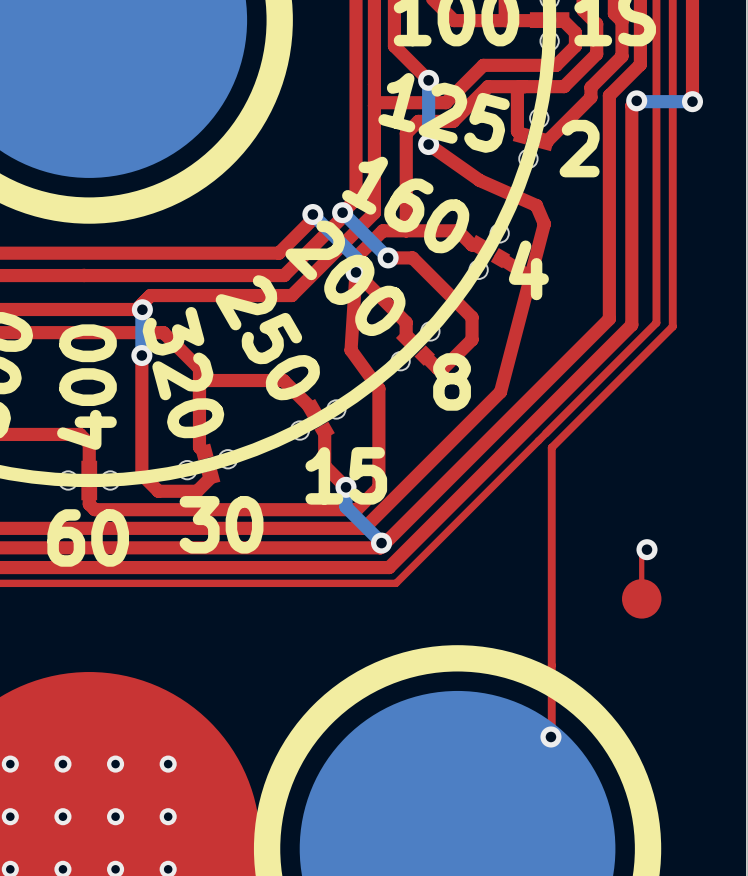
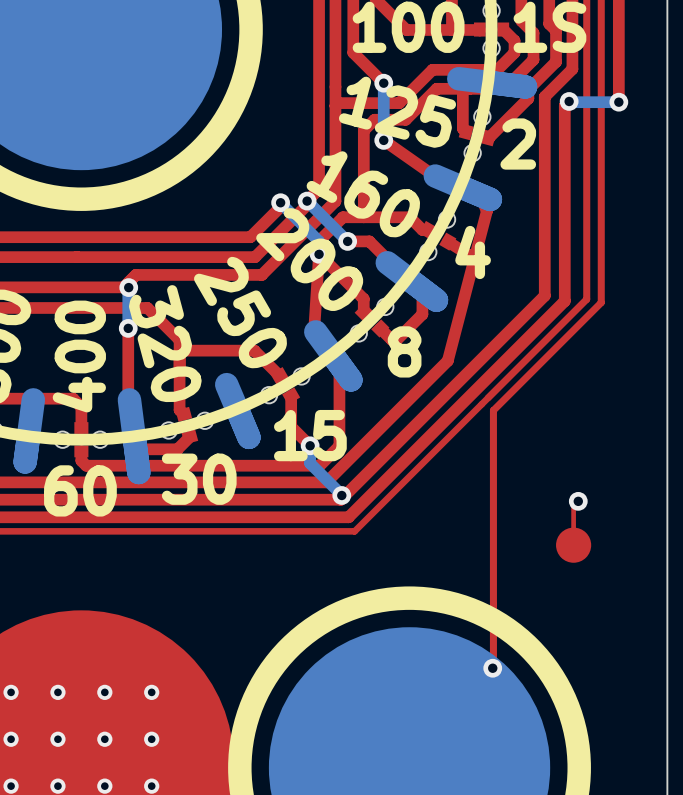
bottom track: none -> (458, 78) (525, 86) (488, 82)
bottom track: none -> (435, 176) (490, 199) (459, 186)
bottom track: none -> (387, 262) (436, 300) (407, 277)
bottom track: none -> (315, 331) (350, 379) (332, 354)
bottom track: none -> (226, 384) (248, 437) (237, 409)
bottom track: none -> (33, 399) (25, 461) (28, 436)
bottom track: none -> (129, 399) (138, 472)

